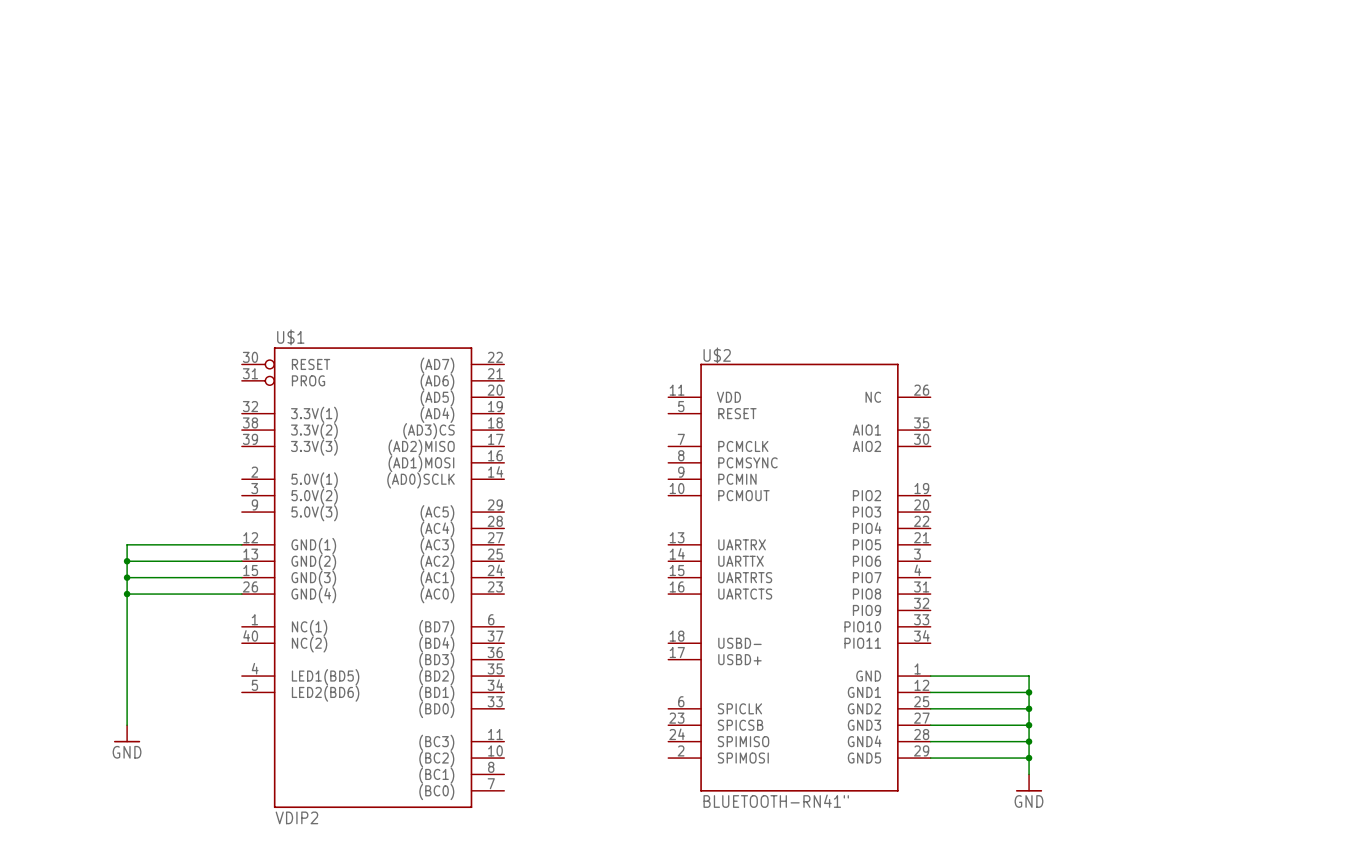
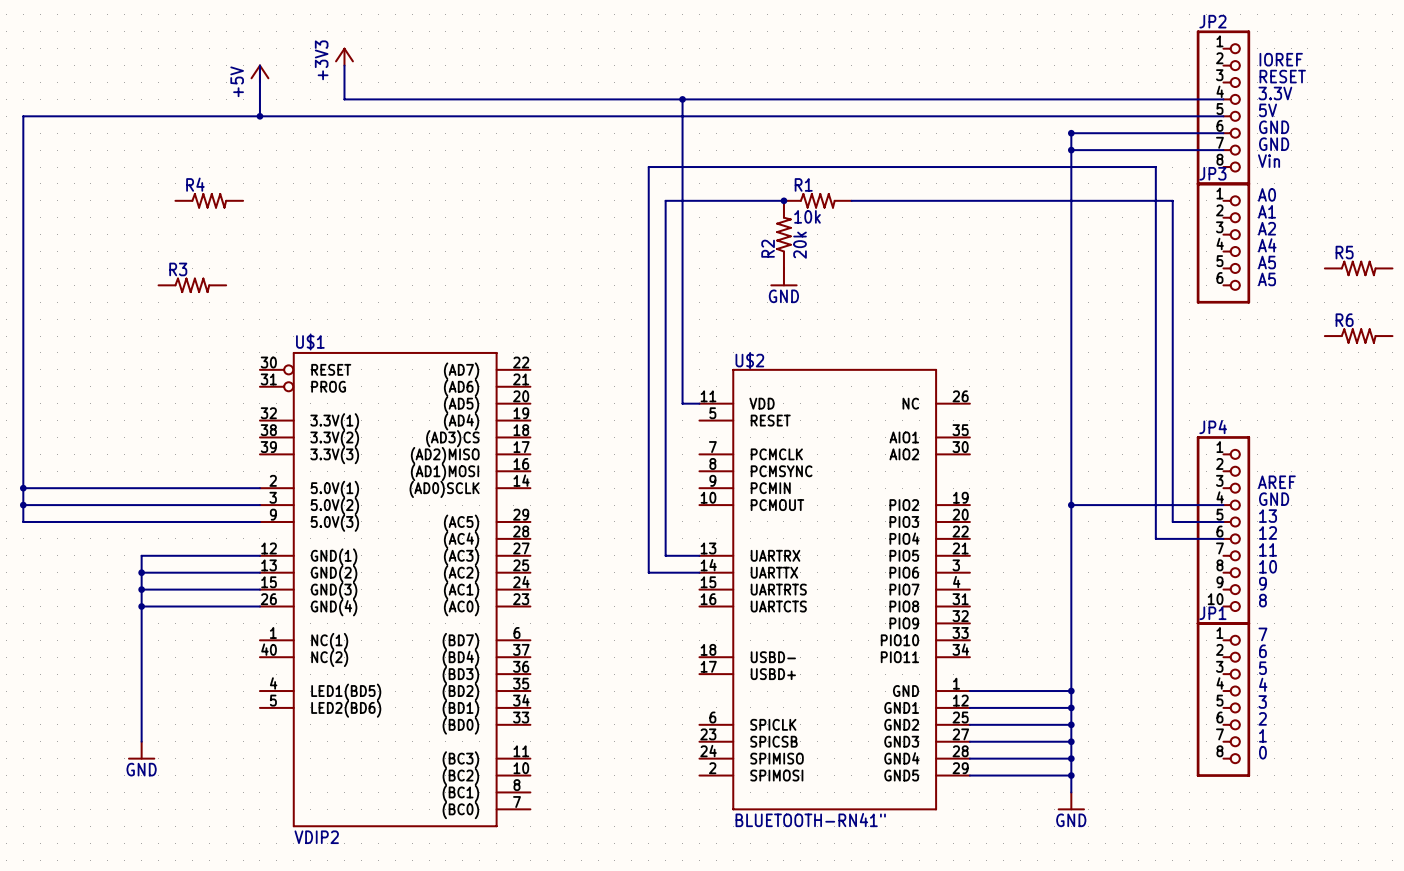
power symbol: none -> +3V3 (344, 56)
text: none -> IOREF (1281, 59)
wire: none -> (259, 65) (259, 116)
wire: none -> (344, 65) (344, 99) (1223, 99)
power symbol: none -> +5V (259, 73)
text: none -> RESET (1282, 76)
text: none -> 3.3V (1275, 93)
wire: none -> (682, 99) (682, 403) (699, 403)
junction: none -> (682, 99)
JP2: none -> (1223, 107)
text: none -> 5V (1268, 110)
junction: none -> (259, 116)
wire: none -> (1223, 116) (23, 116) (23, 521) (259, 521)
text: none -> GND (1274, 127)
junction: none -> (1071, 133)
wire: none -> (1223, 133) (1071, 133) (1071, 691)
text: none -> GND (1274, 144)
wire: none -> (1071, 150) (1223, 150)
junction: none -> (1071, 150)
text: none -> Vin (1269, 161)
text: none -> A0 (1267, 194)
R4: none -> (209, 200)
wire: none -> (783, 200) (665, 200) (665, 555) (699, 555)
junction: none -> (783, 200)
R1: none -> 10k (817, 200)
wire: none -> (851, 200) (1172, 200) (1172, 521) (1223, 521)
text: none -> A1 (1267, 211)
text: none -> A2 (1267, 228)
R2: none -> 20k (783, 234)
JP3: none -> (1223, 243)
text: none -> A4 (1267, 245)
text: none -> A5 (1267, 262)
R5: none -> (1358, 268)
power symbol: none -> GND (783, 277)
text: none -> A5 (1267, 279)
R3: none -> (192, 285)
R6: none -> (1358, 336)
text: none -> AREF (1276, 482)
wire: none -> (23, 488) (259, 488)
junction: none -> (23, 488)
text: none -> GND (1274, 499)
wire: none -> (23, 505) (259, 505)
junction: none -> (23, 505)
wire: none -> (1071, 505) (1223, 505)
junction: none -> (1071, 505)
text: none -> 13 (1268, 516)
JP4: none -> (1223, 530)
text: none -> 12 (1268, 532)
wire: none -> (1223, 538) (1155, 538) (1155, 167) (648, 167) (648, 572) (699, 572)
text: none -> 11 (1268, 549)
text: none -> 10 (1268, 566)
text: none -> 9 (1262, 583)
text: none -> 8 (1262, 600)
text: none -> 7 (1262, 634)
text: none -> 6 (1262, 651)
text: none -> 5 (1262, 668)
text: none -> 4 (1263, 684)
junction: none -> (1071, 691)
JP1: none -> (1223, 699)
text: none -> 3 (1262, 702)
text: none -> 2 (1262, 718)
text: none -> 1 (1262, 735)
text: none -> 0 (1262, 752)

